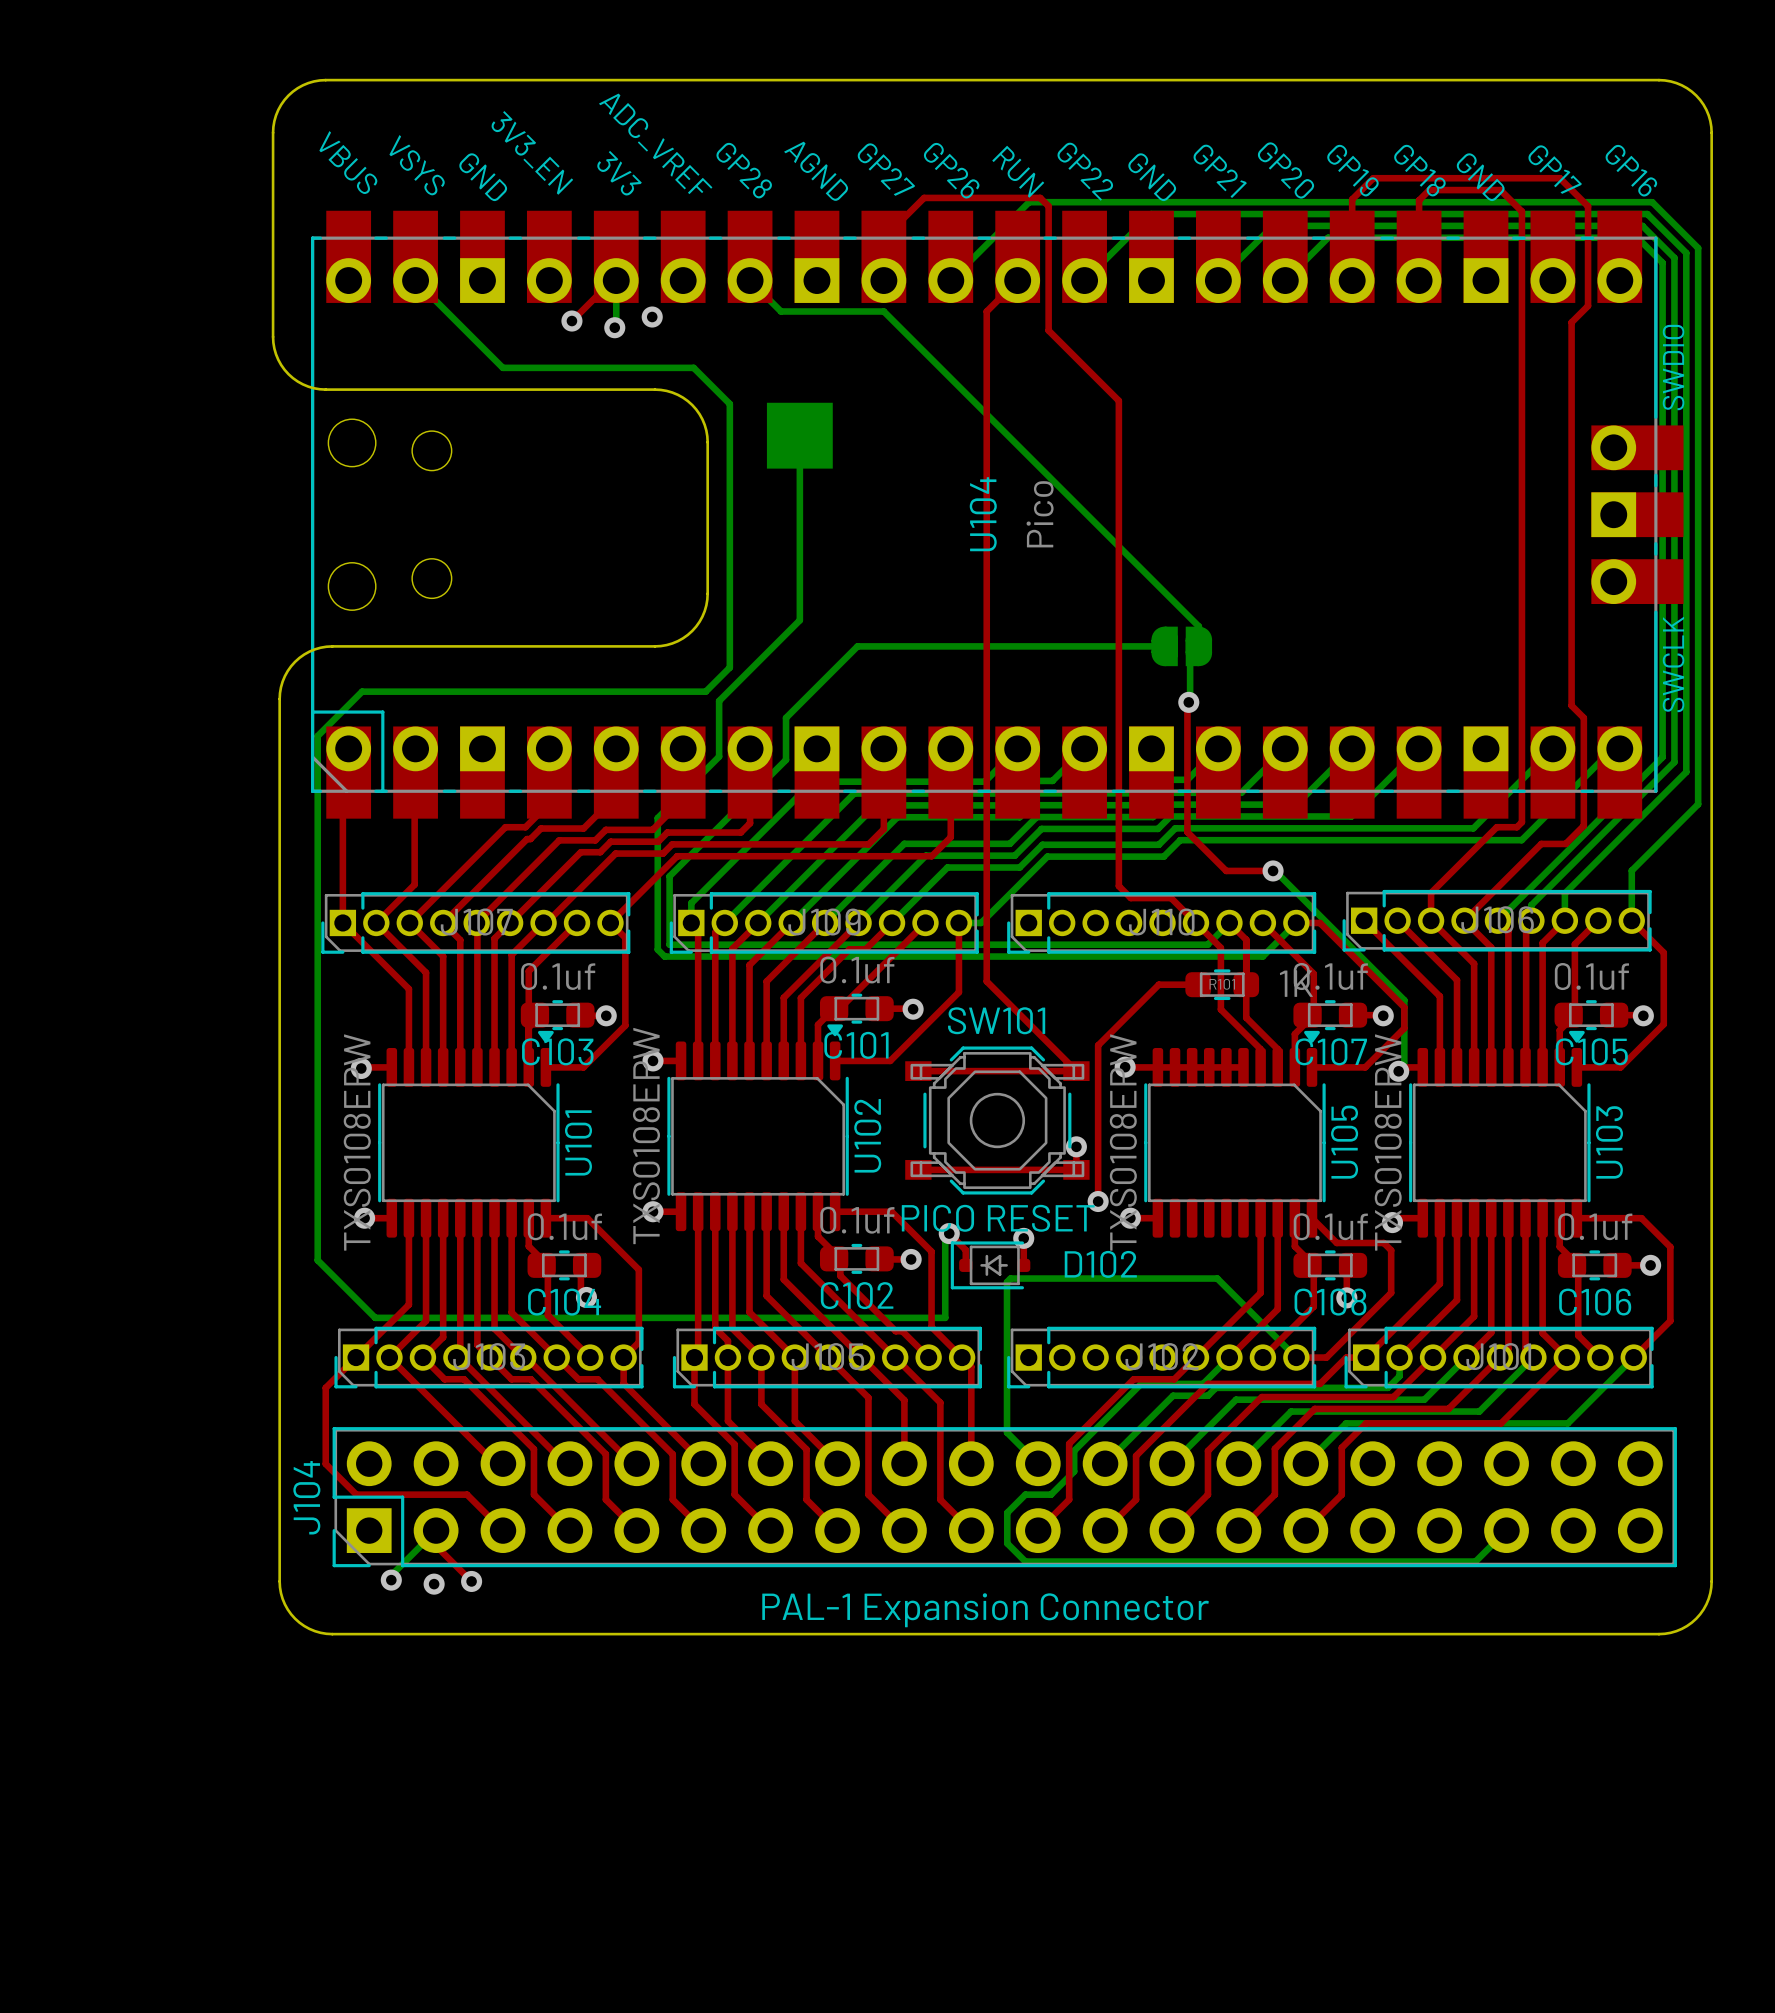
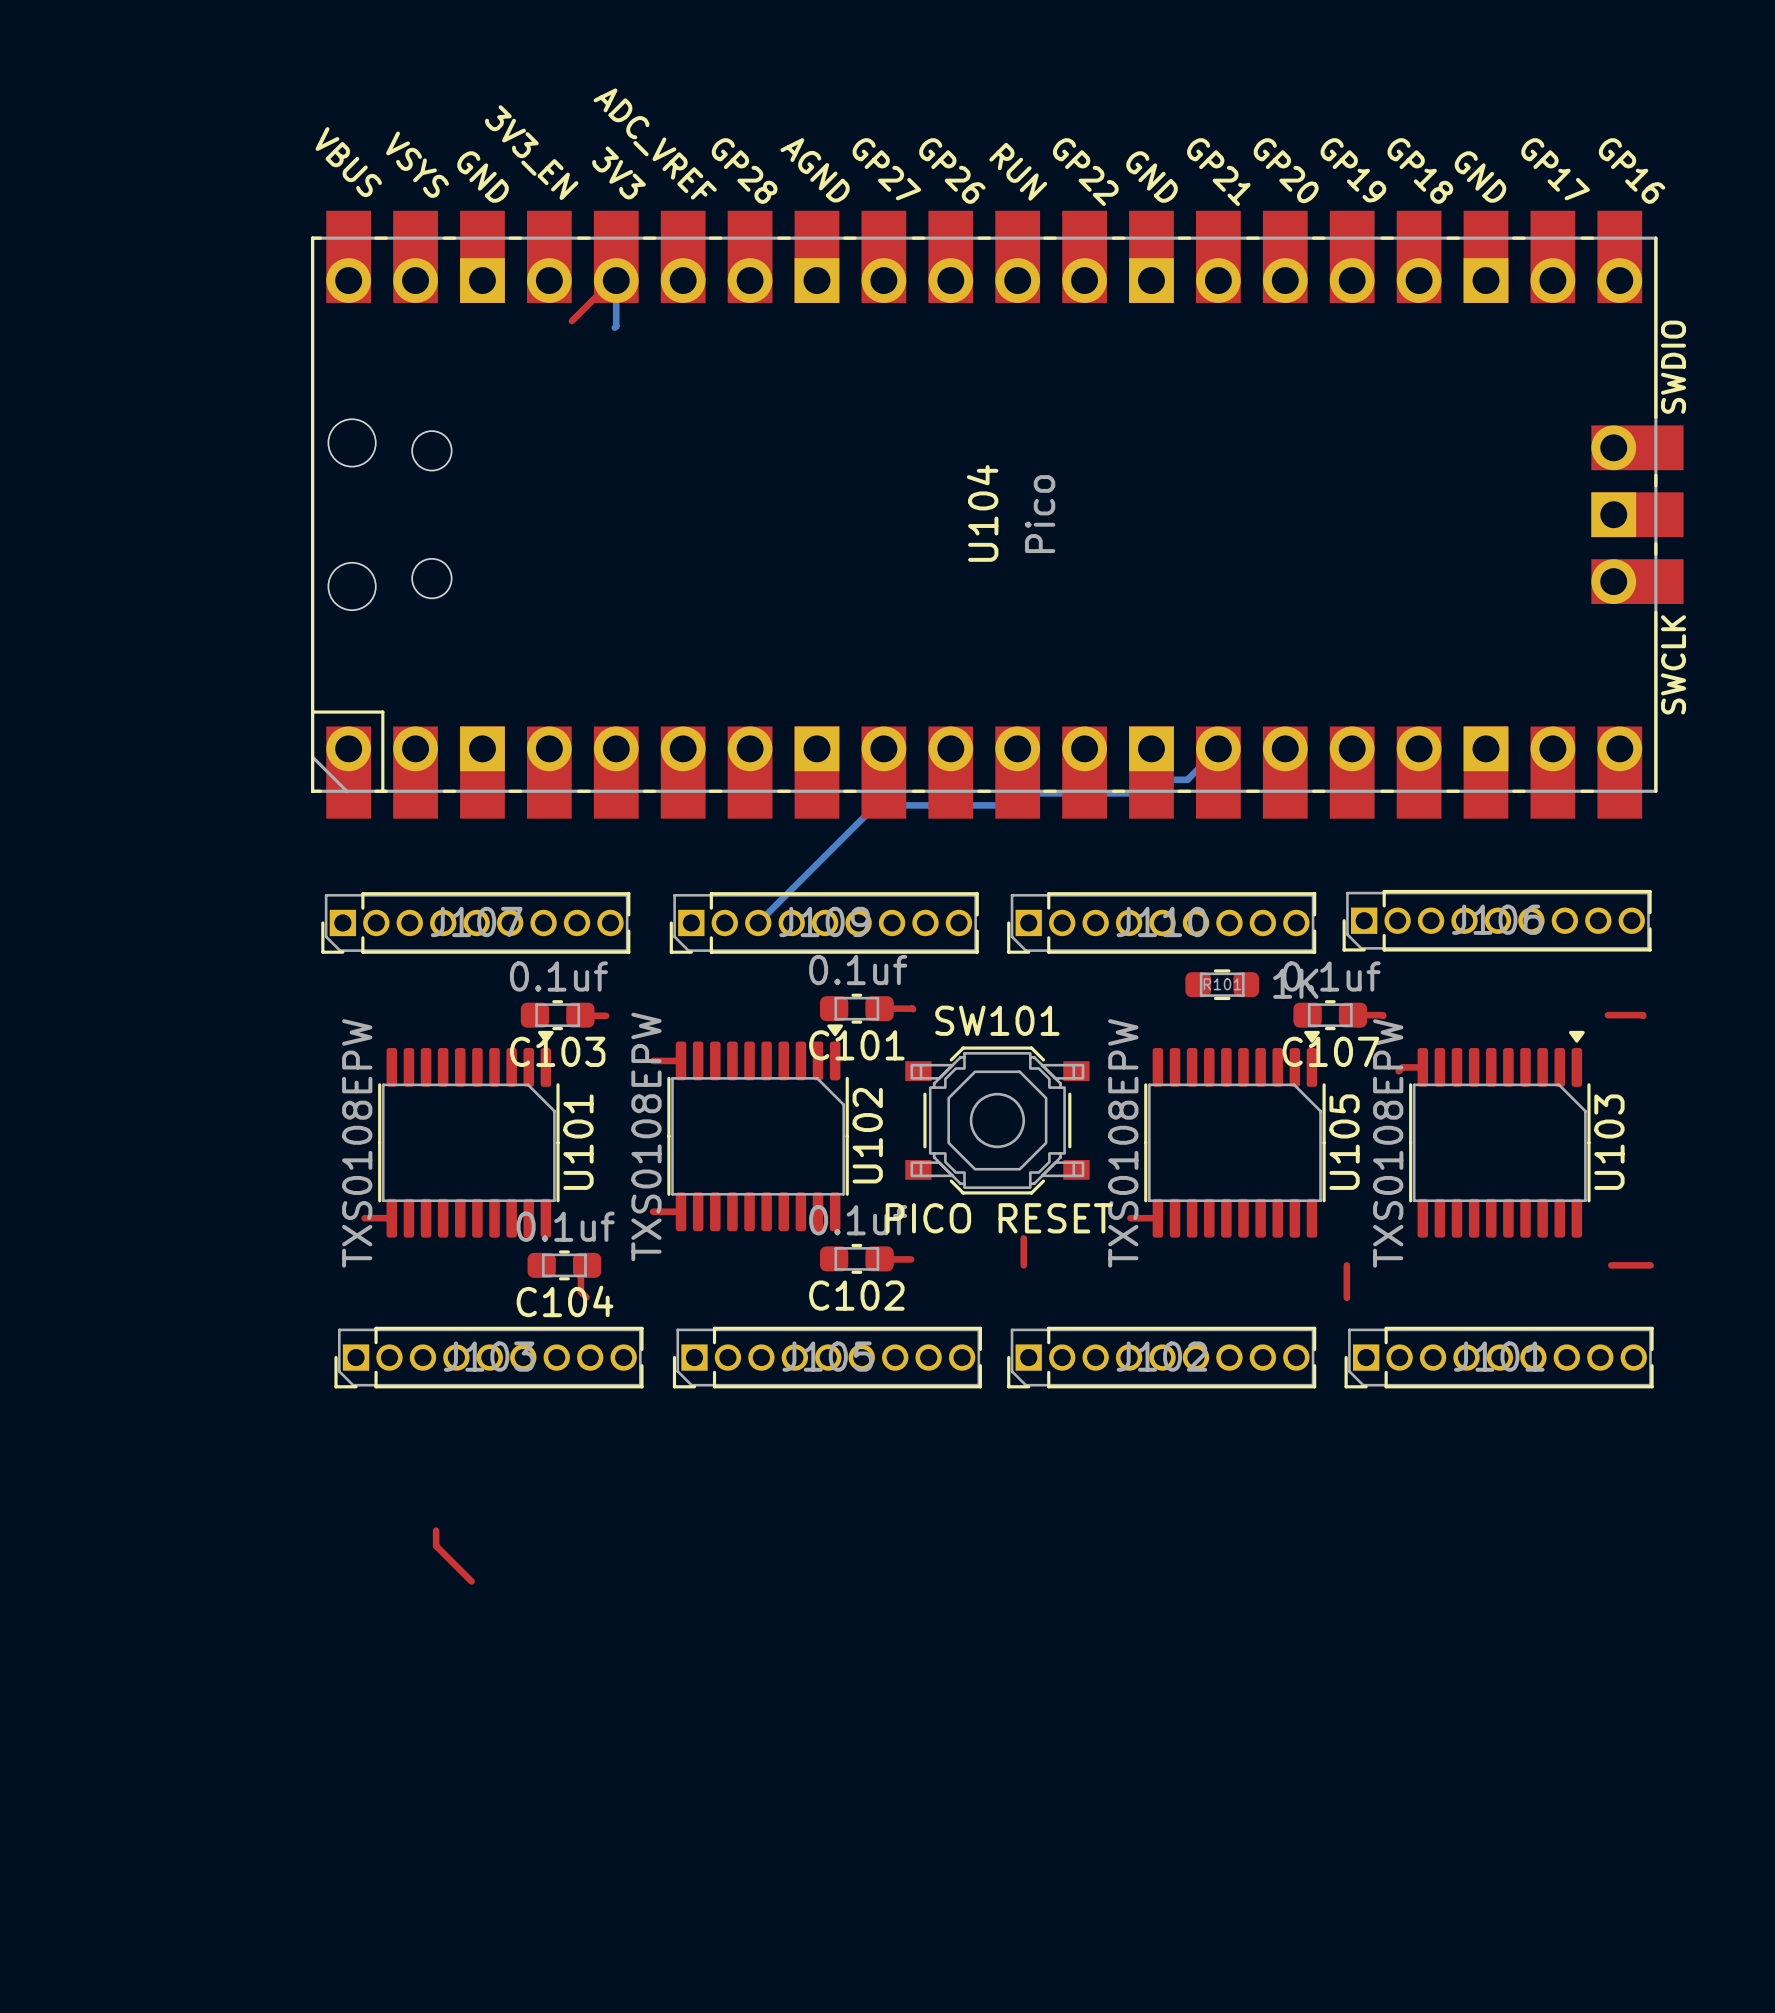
board edge: (325, 80) (1658, 80) (1681, 85) (1700, 99) (1708, 115) (1711, 132) (1711, 1581) (1706, 1604) (1691, 1622) (1676, 1631) (1658, 1634) (332, 1634) (309, 1628) (291, 1614) (282, 1598) (279, 1581) (279, 699) (282, 681) (287, 671) (299, 657) (309, 651) (326, 646) (666, 645) (683, 638) (696, 626) (704, 611) (707, 593) (707, 436) (699, 414) (687, 401) (677, 394) (654, 389) (319, 389) (297, 381) (284, 369) (276, 354) (273, 336) (273, 126) (278, 109) (292, 91) (308, 83) (325, 80) -> none
bottom track: (415, 280) (502, 367) (693, 367) (729, 403) (729, 667) (705, 691) (362, 691) (317, 736) (317, 1260) (375, 1317) (945, 1317) (945, 1237) (949, 1233) -> none
bottom track: (750, 280) (781, 311) (883, 311) (1198, 626) (1198, 646) (1190, 655) (1188, 702) -> none
top track: (883, 280) (883, 238) (924, 197) (1040, 197) (1048, 206) (1048, 330) (1118, 400) (1118, 886) (1130, 898) (1171, 898) (1220, 947) (1220, 1009) (1260, 1049) (1260, 1067) -> none
bottom track: (950, 280) (1029, 202) (1652, 202) (1698, 248) (1698, 804) (1631, 870) (1631, 920) -> none
top track: (1017, 280) (986, 311) (986, 981) (1076, 1071) (918, 1071) -> none
bottom track: (1084, 280) (1151, 214) (1647, 214) (1686, 253) (1686, 772) (1564, 893) (1564, 920) -> none
bottom track: (1218, 280) (1273, 225) (1642, 225) (1674, 257) (1674, 762) (1531, 905) (1531, 920) -> none
bottom track: (1285, 280) (1328, 237) (1637, 237) (1662, 262) (1662, 757) (1497, 920) -> none
top track: (1352, 280) (1352, 199) (1373, 178) (1559, 178) (1588, 206) (1588, 305) (1571, 322) (1571, 705) (1583, 717) (1583, 825) (1565, 843) (1541, 843) (1464, 920) (1491, 947) (1491, 1067) -> none
top track: (1419, 280) (1419, 200) (1429, 190) (1500, 190) (1521, 211) (1521, 822) (1516, 827) (1496, 827) (1431, 892) (1431, 920) (1474, 963) (1474, 1067) -> none
via: (652, 317) -> none
via: (571, 321) -> none
via: (614, 327) -> none
bottom track: (799, 435) (799, 620) (719, 701) (719, 756) (657, 818) (657, 949) (664, 956) (1262, 956) (1296, 922) -> none
part: (799, 435) -> none
bottom track: (1164, 646) (857, 646) (786, 717) (786, 759) (669, 876) (669, 944) (1207, 944) (1229, 922) -> none
part: (1181, 646) -> none
top track: (1188, 702) (1187, 832) (1226, 870) (1273, 870) -> none
via: (1188, 702) -> none
top track: (348, 748) (342, 754) (342, 922) (408, 989) (408, 1067) -> none
top track: (415, 748) (414, 884) (376, 922) (426, 972) (426, 1067) -> none
top track: (549, 748) (549, 803) (525, 827) (505, 827) (409, 922) (443, 956) (443, 1067) -> none
top track: (616, 748) (616, 795) (583, 828) (540, 828) (530, 839) (527, 839) (443, 922) (460, 940) (460, 1067) -> none
top track: (683, 748) (683, 799) (652, 829) (605, 829) (595, 840) (559, 840) (476, 922) (477, 1067) -> none
top track: (750, 748) (750, 823) (740, 832) (667, 832) (658, 841) (610, 841) (600, 852) (580, 852) (494, 938) (494, 1067) -> none
top track: (883, 748) (883, 829) (868, 844) (672, 844) (663, 853) (615, 853) (511, 954) (511, 1067) -> none
top track: (950, 748) (950, 837) (931, 856) (677, 856) (610, 922) (625, 937) (625, 1025) (583, 1067) (545, 1067) -> none
bottom track: (1017, 748) (984, 781) (812, 781) (691, 903) (691, 922) -> none
bottom track: (1084, 748) (1052, 780) (1017, 780) (1004, 793) (854, 793) (724, 922) -> none
bottom track: (1285, 748) (1241, 792) (1160, 792) (1148, 805) (1031, 805) (1019, 817) (897, 817) (791, 922) -> none
bottom track: (1352, 748) (1296, 804) (1165, 804) (1153, 817) (1036, 817) (1009, 843) (904, 843) (825, 922) -> none
bottom track: (1419, 748) (1351, 816) (1170, 816) (1158, 828) (1041, 828) (1014, 855) (925, 855) (858, 922) -> none
bottom track: (1552, 748) (1473, 828) (1175, 828) (1158, 844) (1042, 844) (1019, 867) (947, 867) (892, 922) -> none
bottom track: (1619, 748) (1613, 748) (1521, 840) (1180, 840) (1163, 856) (1047, 856) (981, 922) (958, 922) -> none
bottom track: (1273, 870) (1404, 1000) (1404, 1065) (1398, 1071) -> none
via: (1273, 870) -> none
top track: (1223, 917) (1246, 939) (1246, 1017) (1277, 1049) (1277, 1067) -> none
top track: (1364, 920) (1439, 996) (1439, 1067) -> none
top track: (1397, 920) (1457, 980) (1457, 1067) -> none
top track: (1497, 920) (1508, 931) (1508, 1067) -> none
top track: (1531, 920) (1526, 925) (1525, 1067) -> none
top track: (1564, 920) (1542, 942) (1542, 1067) -> none
top track: (1598, 920) (1574, 944) (1574, 1015) (1559, 1030) (1559, 1067) -> none
top track: (1631, 920) (1663, 952) (1663, 1024) (1620, 1067) (1576, 1067) -> none
top track: (577, 922) (528, 971) (528, 1067) -> none
top track: (691, 922) (698, 929) (698, 1060) -> none
top track: (724, 922) (715, 932) (715, 1060) -> none
top track: (758, 922) (732, 948) (732, 1060) -> none
top track: (791, 922) (749, 965) (749, 1060) -> none
top track: (825, 922) (766, 981) (766, 1060) -> none
top track: (858, 922) (783, 997) (783, 1060) -> none
top track: (892, 922) (865, 949) (849, 949) (800, 997) (800, 1060) -> none
top track: (925, 922) (839, 1008) (834, 1008) (818, 1024) (818, 1060) -> none
top track: (958, 922) (958, 992) (890, 1060) (835, 1060) -> none
top track: (1262, 922) (1313, 973) (1313, 1015) (1294, 1034) (1294, 1067) -> none
top track: (1296, 922) (1319, 922) (1404, 1007) (1404, 1028) (1365, 1067) (1311, 1067) -> none
top track: (1198, 984) (1158, 984) (1098, 1045) (1098, 1201) -> none
via: (913, 1009) -> none
via: (606, 1015) -> none
via: (1383, 1015) -> none
C105: 0.1uf (1591, 1015) -> none
via: (1643, 1015) -> none
via: (653, 1060) -> none
top track: (391, 1067) (361, 1068) -> none
top track: (1125, 1067) (1243, 1067) -> none
via: (1125, 1067) -> none
via: (361, 1068) -> none
via: (1398, 1071) -> none
top track: (1076, 1146) (1076, 1169) (918, 1169) -> none
via: (1076, 1146) -> none
via: (1098, 1201) -> none
via: (653, 1211) -> none
top track: (698, 1211) (698, 1353) (694, 1357) (694, 1404) (734, 1444) (734, 1494) (770, 1530) -> none
top track: (715, 1211) (715, 1328) (727, 1340) (727, 1421) (770, 1463) -> none
top track: (732, 1211) (732, 1328) (761, 1357) (761, 1404) (806, 1449) (806, 1499) (837, 1530) -> none
top track: (749, 1211) (749, 1312) (794, 1357) (794, 1421) (837, 1463) -> none
top track: (766, 1211) (766, 1295) (868, 1397) (868, 1494) (904, 1530) -> none
top track: (783, 1211) (783, 1279) (904, 1400) (904, 1463) -> none
top track: (800, 1211) (800, 1263) (940, 1402) (940, 1499) (971, 1530) -> none
top track: (818, 1211) (818, 1236) (840, 1258) (840, 1275) (895, 1331) (902, 1331) (928, 1357) -> none
top track: (835, 1211) (891, 1211) (931, 1251) (931, 1327) (971, 1366) (971, 1463) -> none
via: (364, 1218) -> none
top track: (408, 1218) (408, 1304) (325, 1387) (325, 1464) (356, 1494) (467, 1494) (503, 1530) -> none
top track: (426, 1218) (426, 1321) (389, 1357) (495, 1463) (503, 1463) -> none
top track: (443, 1218) (443, 1337) (422, 1357) (444, 1379) (464, 1379) (533, 1449) (533, 1494) (569, 1530) -> none
top track: (460, 1218) (460, 1353) (456, 1357) (459, 1357) (565, 1463) (569, 1463) -> none
top track: (477, 1218) (477, 1345) (511, 1379) (530, 1379) (605, 1454) (605, 1499) (636, 1530) -> none
top track: (494, 1218) (494, 1328) (632, 1463) (636, 1463) -> none
top track: (511, 1218) (511, 1312) (578, 1379) (597, 1379) (672, 1454) (672, 1499) (703, 1530) -> none
top track: (528, 1218) (528, 1246) (547, 1265) (547, 1315) (590, 1357) -> none
top track: (545, 1218) (587, 1218) (638, 1269) (638, 1342) (623, 1357) (623, 1383) (703, 1463) -> none
via: (1130, 1218) -> none
top track: (1260, 1218) (1260, 1292) (1174, 1379) (1133, 1379) (1069, 1443) (1069, 1499) (1038, 1530) -> none
top track: (1277, 1218) (1277, 1309) (1229, 1357) -> none
top track: (1294, 1218) (1294, 1246) (1313, 1265) (1313, 1306) (1262, 1357) -> none
top track: (1311, 1218) (1336, 1242) (1383, 1242) (1391, 1250) (1391, 1292) (1326, 1357) (1296, 1357) -> none
top track: (1422, 1218) (1396, 1218) (1392, 1222) -> none
top track: (1439, 1218) (1439, 1283) (1366, 1357) (1346, 1357) (1320, 1383) (1208, 1383) (1136, 1455) (1136, 1499) (1105, 1530) -> none
top track: (1457, 1218) (1457, 1300) (1399, 1357) -> none
top track: (1474, 1218) (1474, 1316) (1393, 1397) (1261, 1397) (1207, 1450) (1207, 1494) (1172, 1530) -> none
top track: (1491, 1218) (1491, 1332) (1466, 1357) -> none
top track: (1508, 1218) (1508, 1349) (1448, 1408) (1314, 1408) (1274, 1448) (1274, 1494) (1238, 1530) -> none
top track: (1525, 1218) (1525, 1349) (1533, 1357) -> none
top track: (1542, 1218) (1542, 1333) (1566, 1357) (1501, 1423) (1366, 1423) (1341, 1447) (1341, 1494) (1305, 1530) -> none
top track: (1559, 1218) (1559, 1246) (1578, 1265) (1578, 1335) (1600, 1357) -> none
top track: (1576, 1218) (1641, 1218) (1670, 1247) (1670, 1320) (1633, 1357) -> none
via: (1392, 1222) -> none
top track: (949, 1233) (965, 1250) (965, 1265) -> none
via: (949, 1233) -> none
via: (1023, 1238) -> none
via: (911, 1259) -> none
D102: (990, 1265) -> none
C108: 0.1uf (1330, 1265) -> none
C106: 0.1uf (1594, 1265) -> none
via: (1650, 1265) -> none
via: (586, 1297) -> none
via: (1346, 1297) -> none
bottom track: (1229, 1357) (1203, 1383) (1141, 1383) (1074, 1450) (1074, 1471) (1051, 1494) (1025, 1494) (1007, 1512) (1007, 1543) (1025, 1561) (1475, 1561) (1506, 1530) -> none
bottom track: (1296, 1357) (1217, 1278) (1010, 1278) (1007, 1282) (1007, 1432) (1038, 1463) -> none
bottom track: (1399, 1357) (1399, 1376) (1387, 1387) (1215, 1387) (1208, 1395) (1173, 1395) (1105, 1463) -> none
bottom track: (1466, 1357) (1424, 1399) (1236, 1399) (1172, 1463) -> none
bottom track: (1533, 1357) (1479, 1411) (1291, 1411) (1238, 1463) -> none
bottom track: (1633, 1357) (1567, 1423) (1346, 1423) (1305, 1463) -> none
J104: PAL-1 Expansion Connector (1004, 1497) -> none
bottom track: (436, 1530) (391, 1575) (391, 1580) -> none
via: (391, 1580) -> none
via: (471, 1581) -> none
via: (434, 1584) -> none

